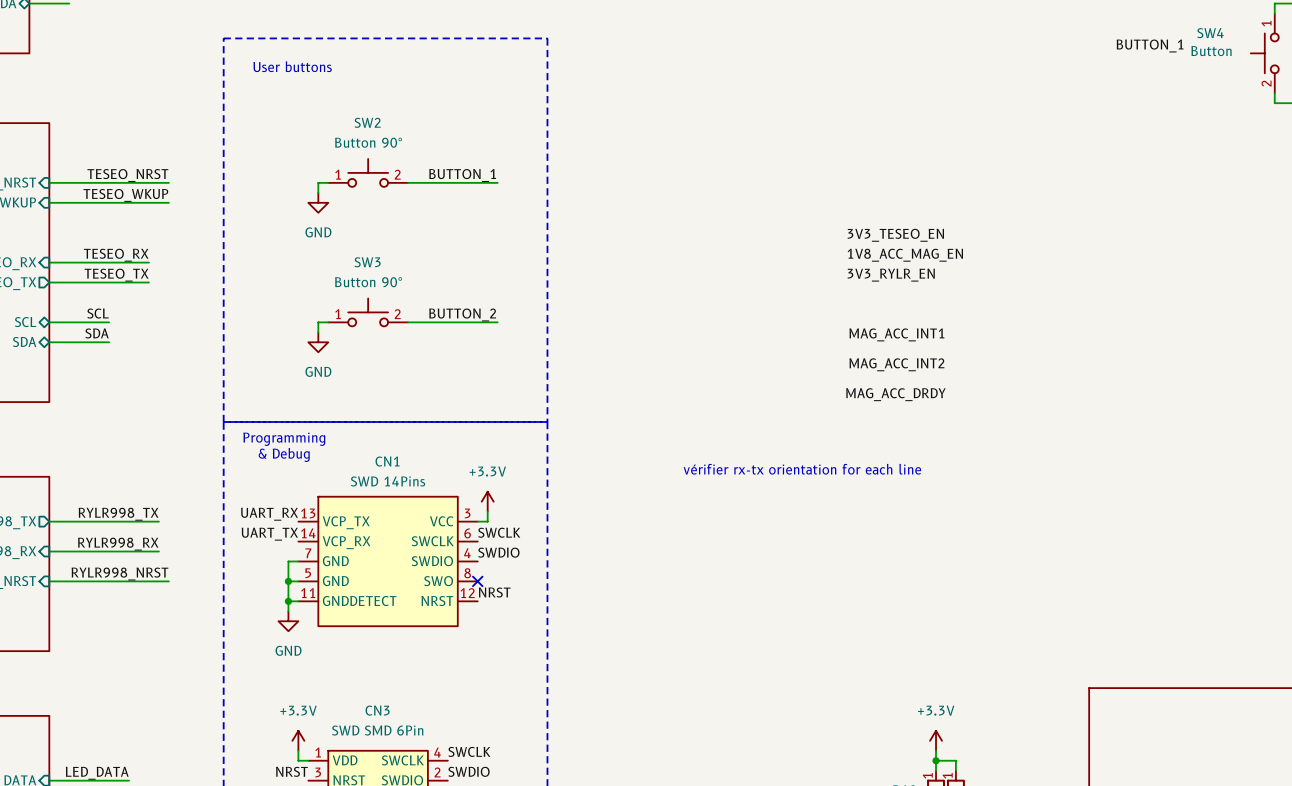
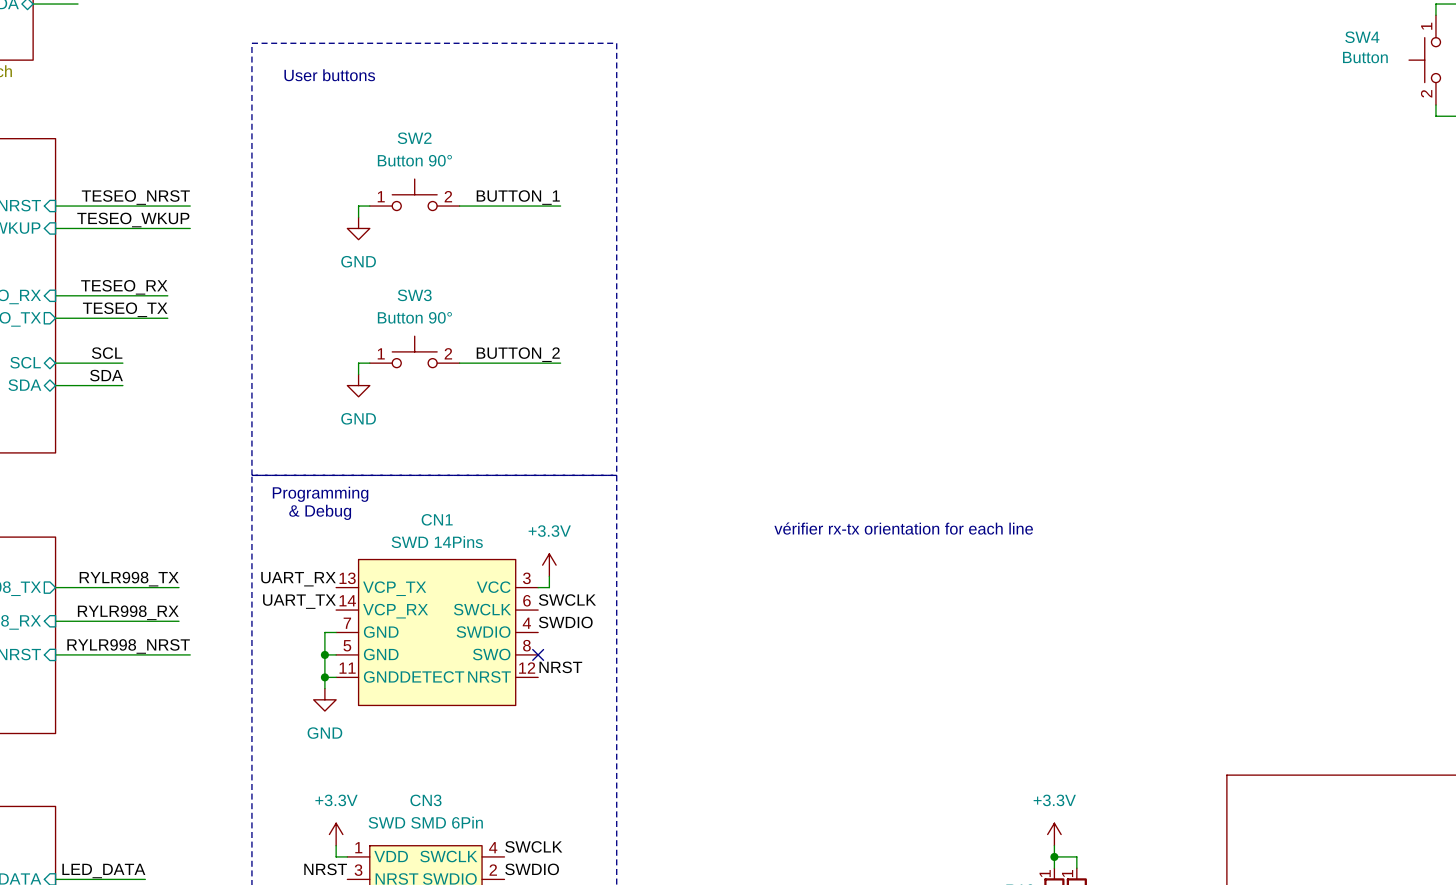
label: BUTTON_1 (1150, 45) -> none
label: 3V3_TESEO_EN (895, 235) -> none
label: 1V8_ACC_MAG_EN (905, 255) -> none
label: 3V3_RYLR_EN (891, 275) -> none
label: MAG_ACC_INT1 (896, 334) -> none
label: MAG_ACC_INT2 (896, 364) -> none
label: MAG_ACC_DRDY (895, 394) -> none

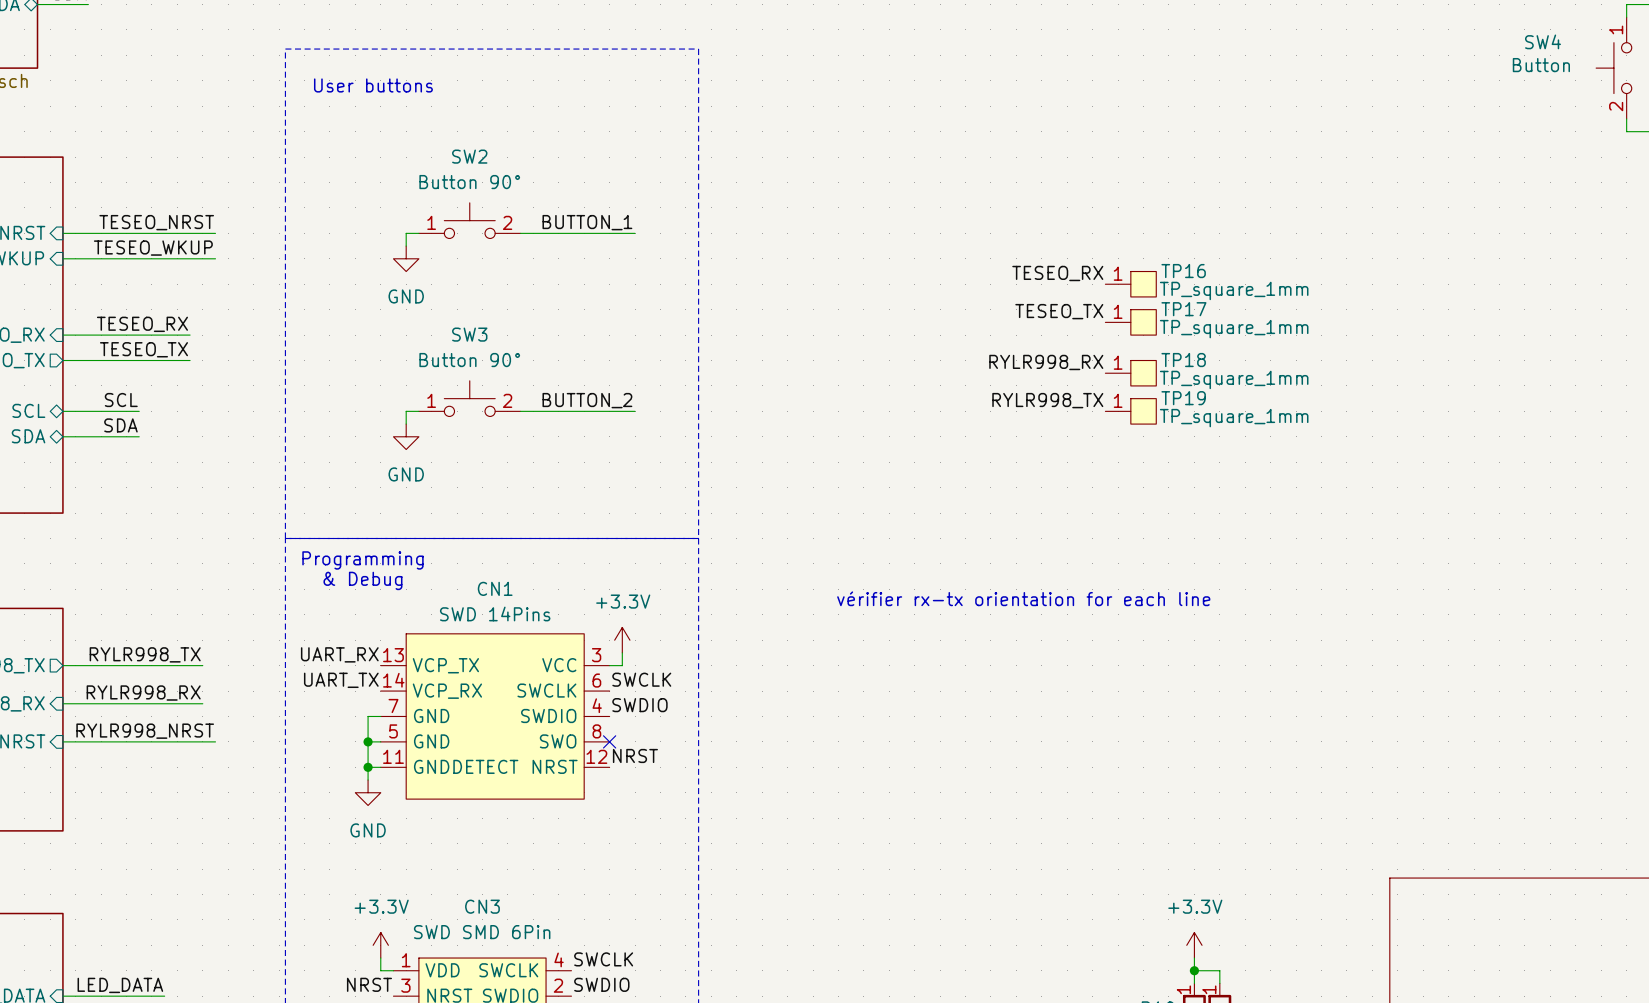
label: none -> TESEO_RX (1057, 273)
TP16: none -> TP_square_1mm (1130, 284)
label: none -> TESEO_TX (1059, 311)
TP17: none -> TP_square_1mm (1130, 322)
label: none -> RYLR998_RX (1046, 362)
TP18: none -> TP_square_1mm (1130, 373)
label: none -> RYLR998_TX (1047, 400)
TP19: none -> TP_square_1mm (1130, 411)

